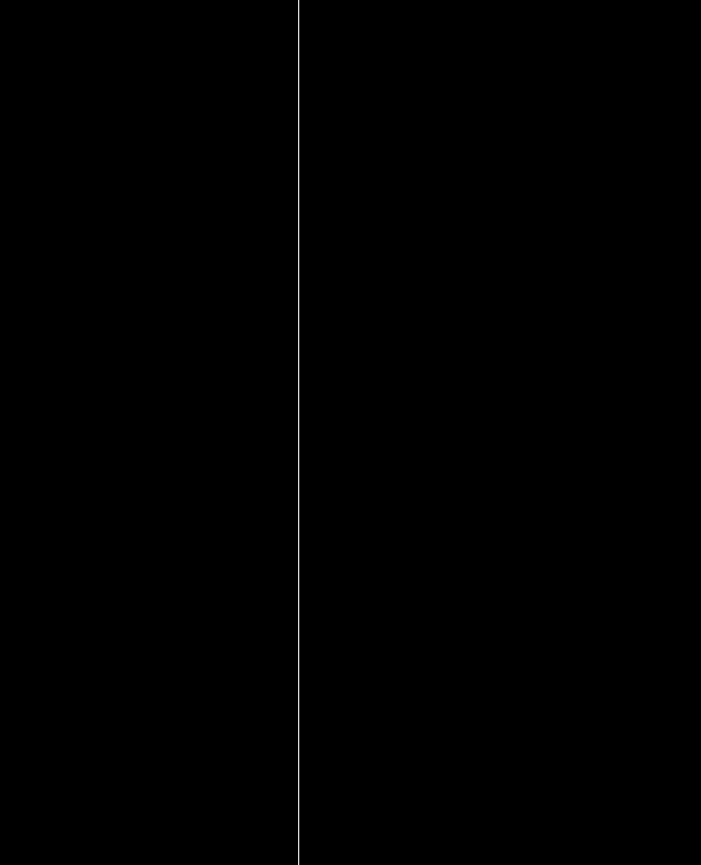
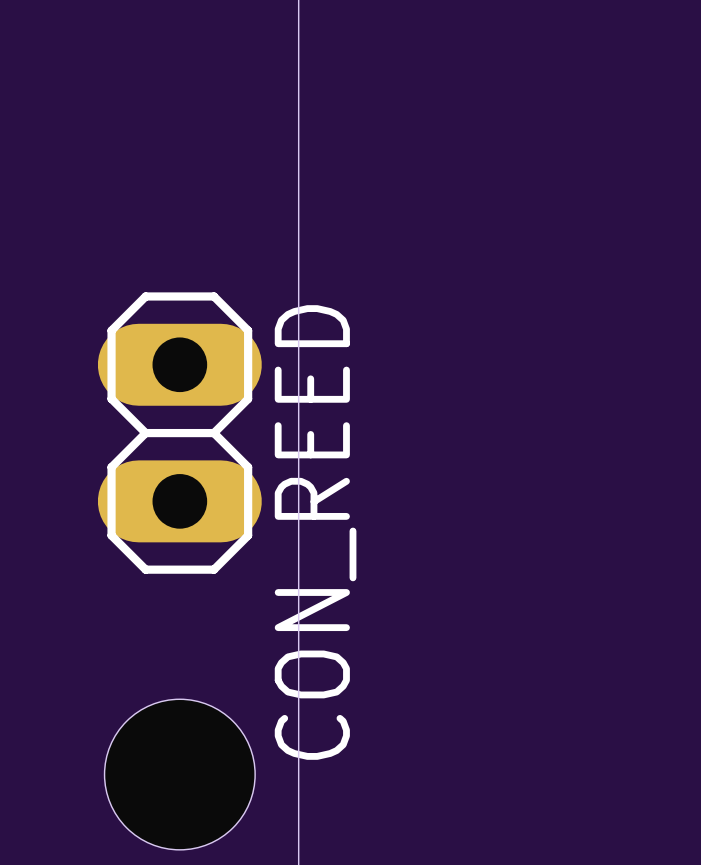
CON_REED: none -> (179, 433)
hole: none -> (179, 774)

